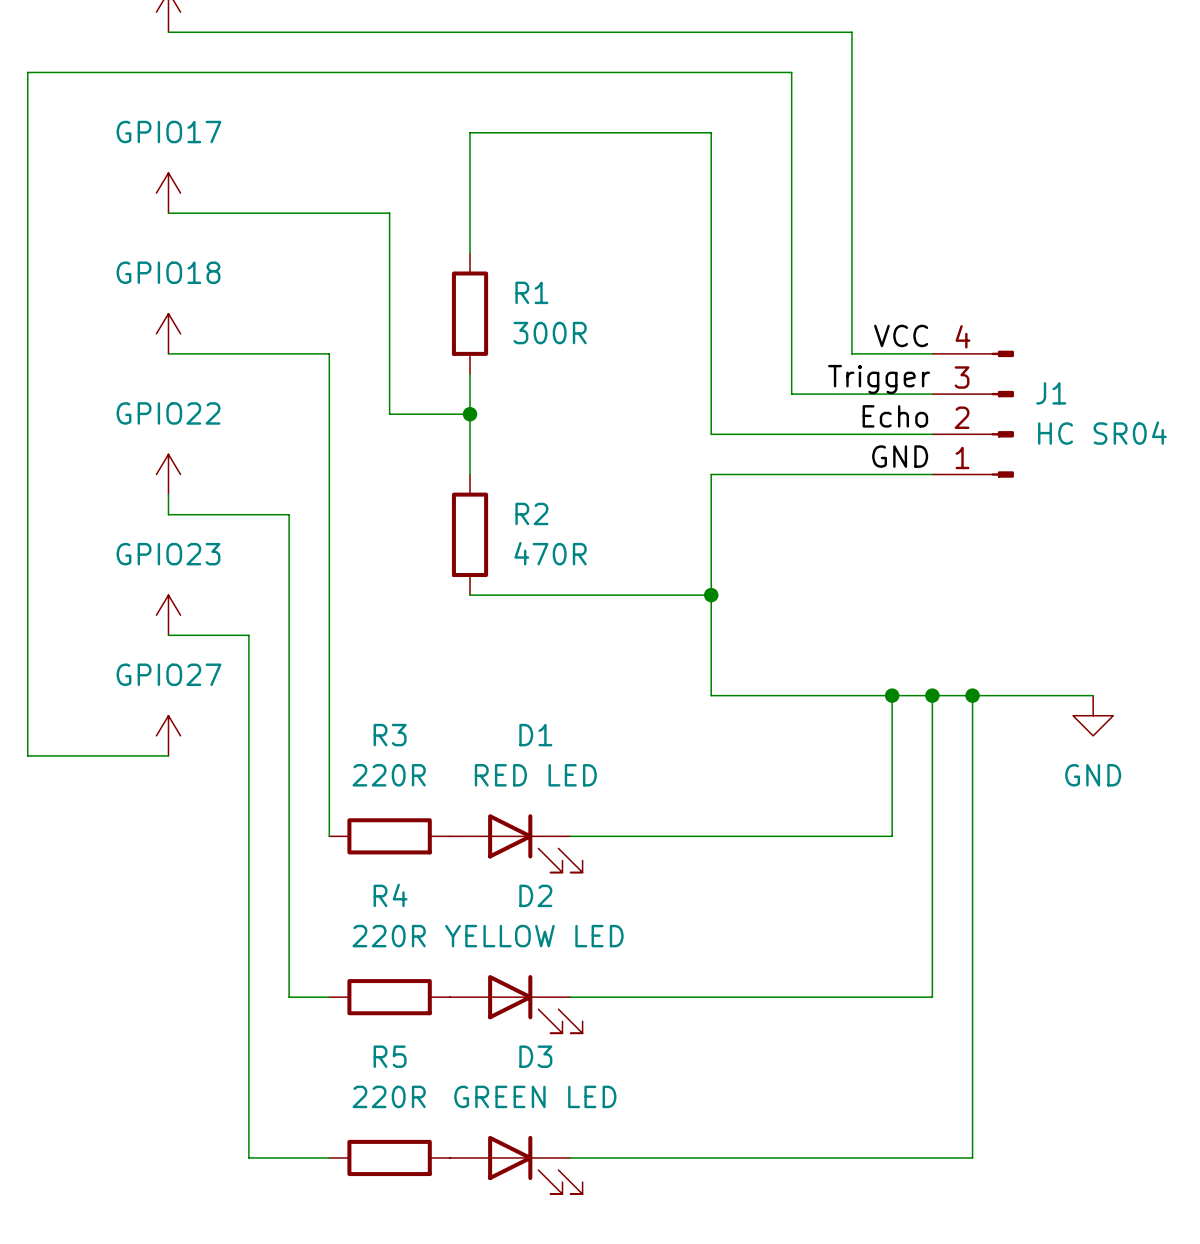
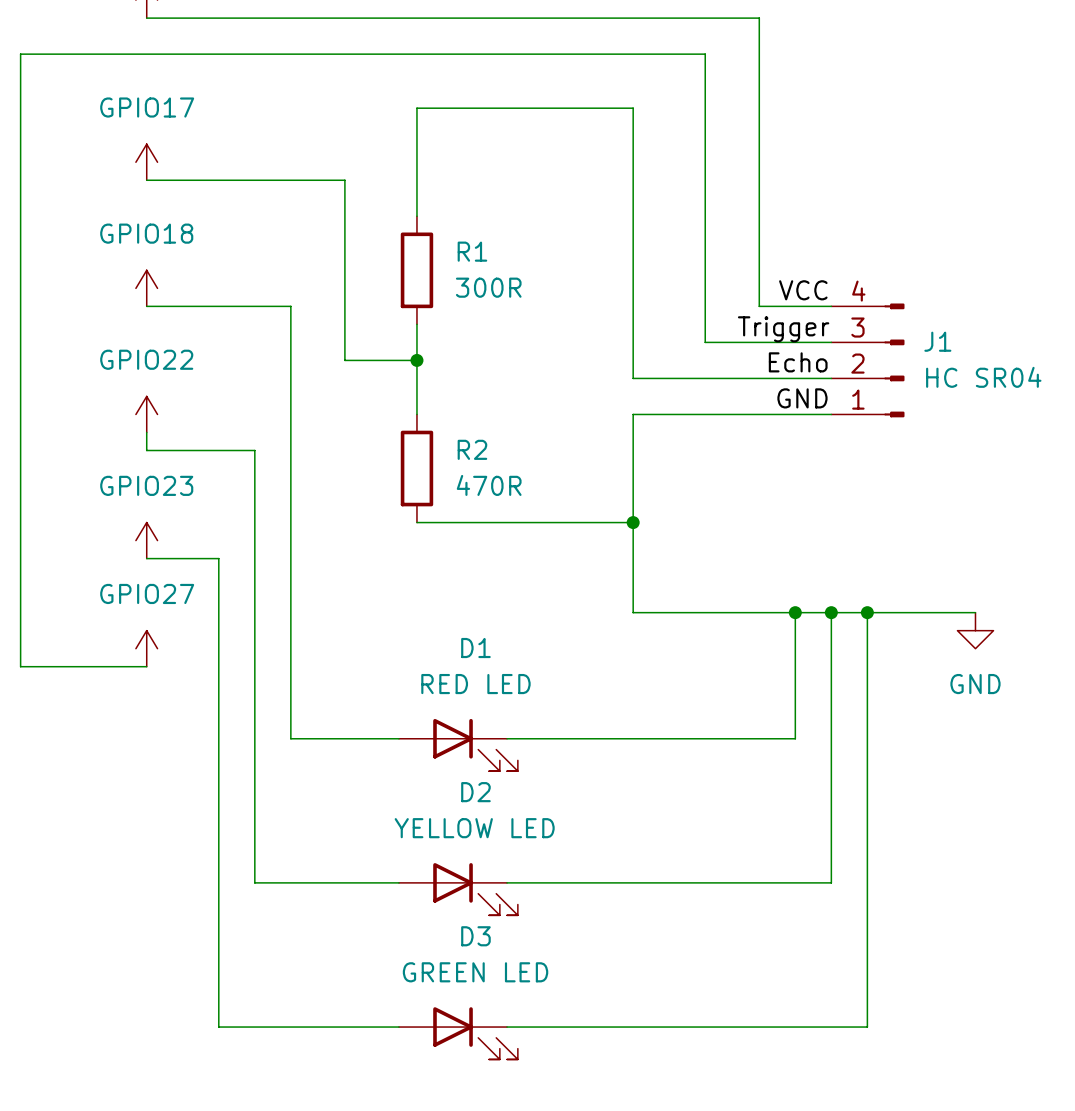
wire: none -> (290, 738) (398, 738)
R3: 220R (389, 836) -> none
wire: none -> (290, 882) (398, 882)
R4: 220R (389, 997) -> none
wire: none -> (290, 1027) (398, 1027)
R5: 220R (389, 1157) -> none

